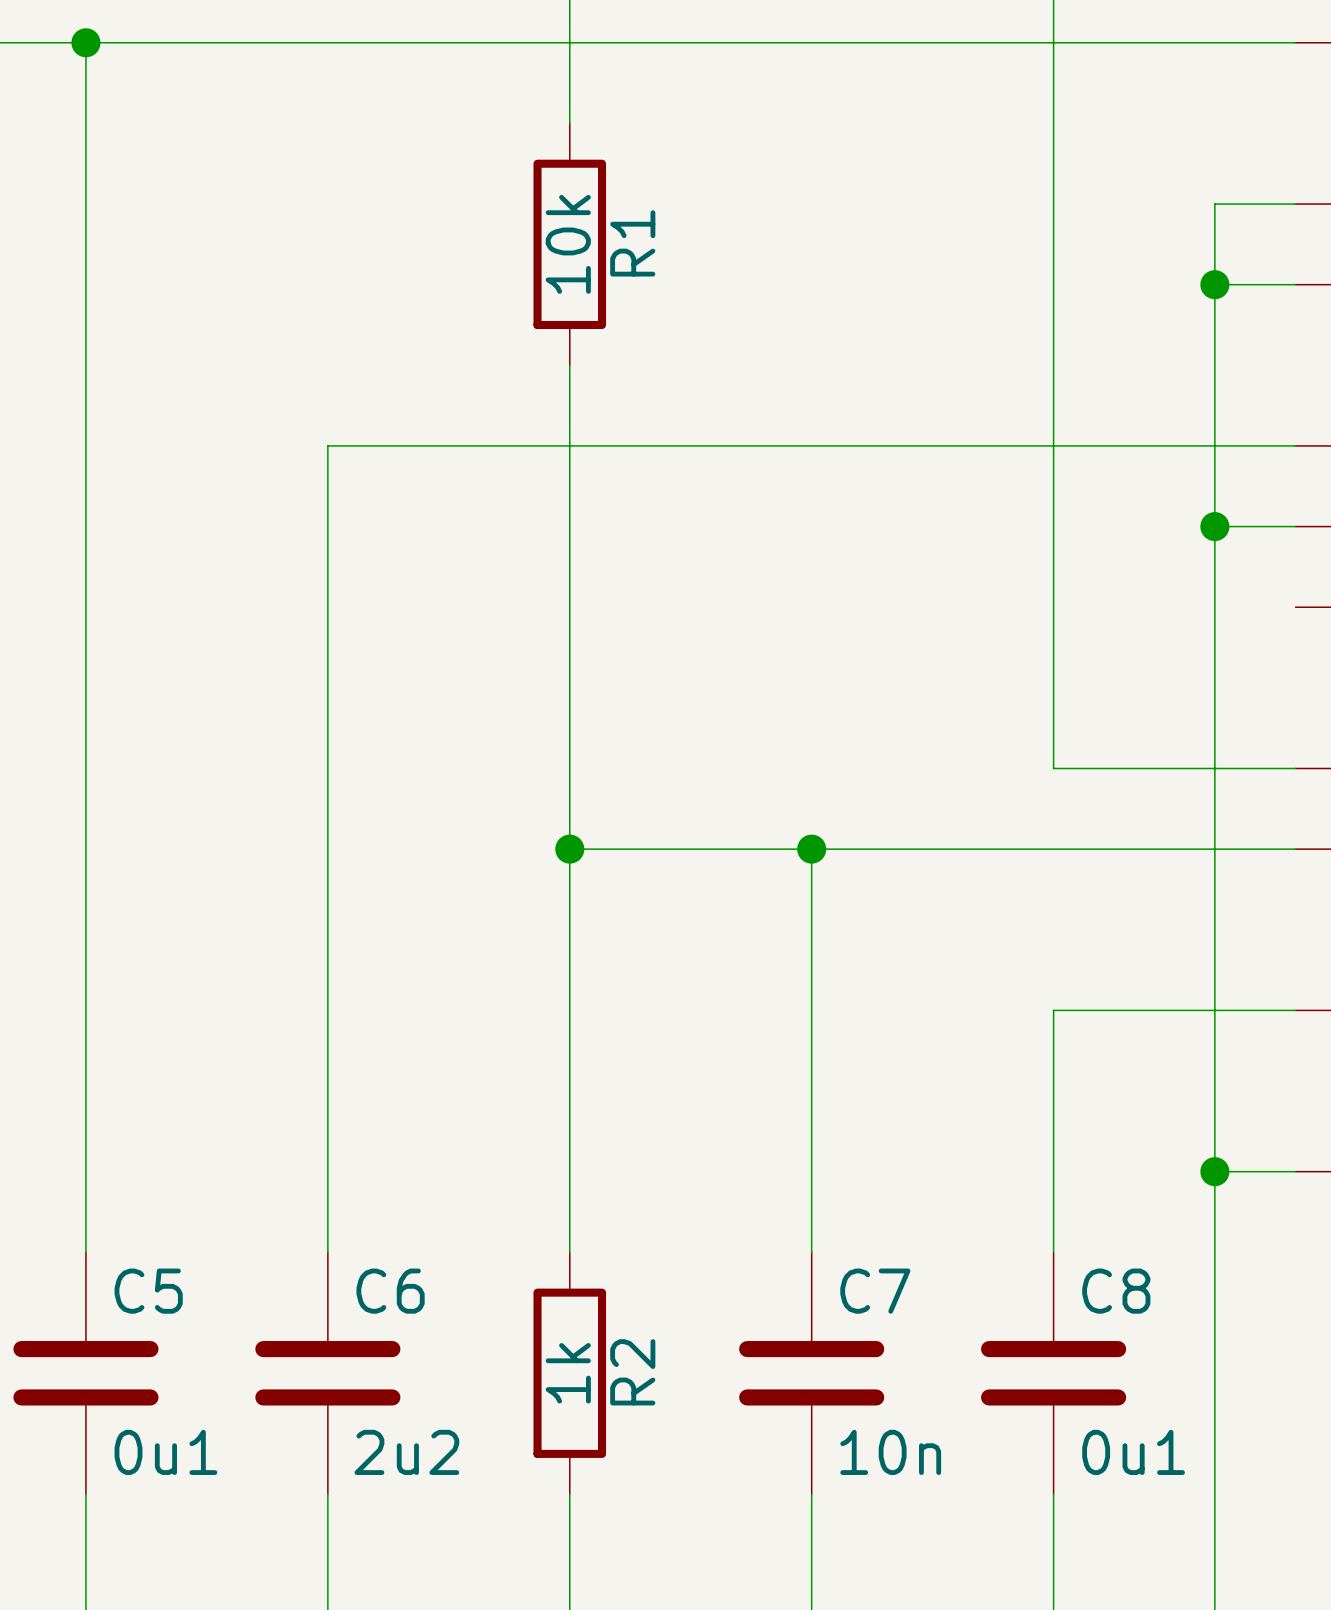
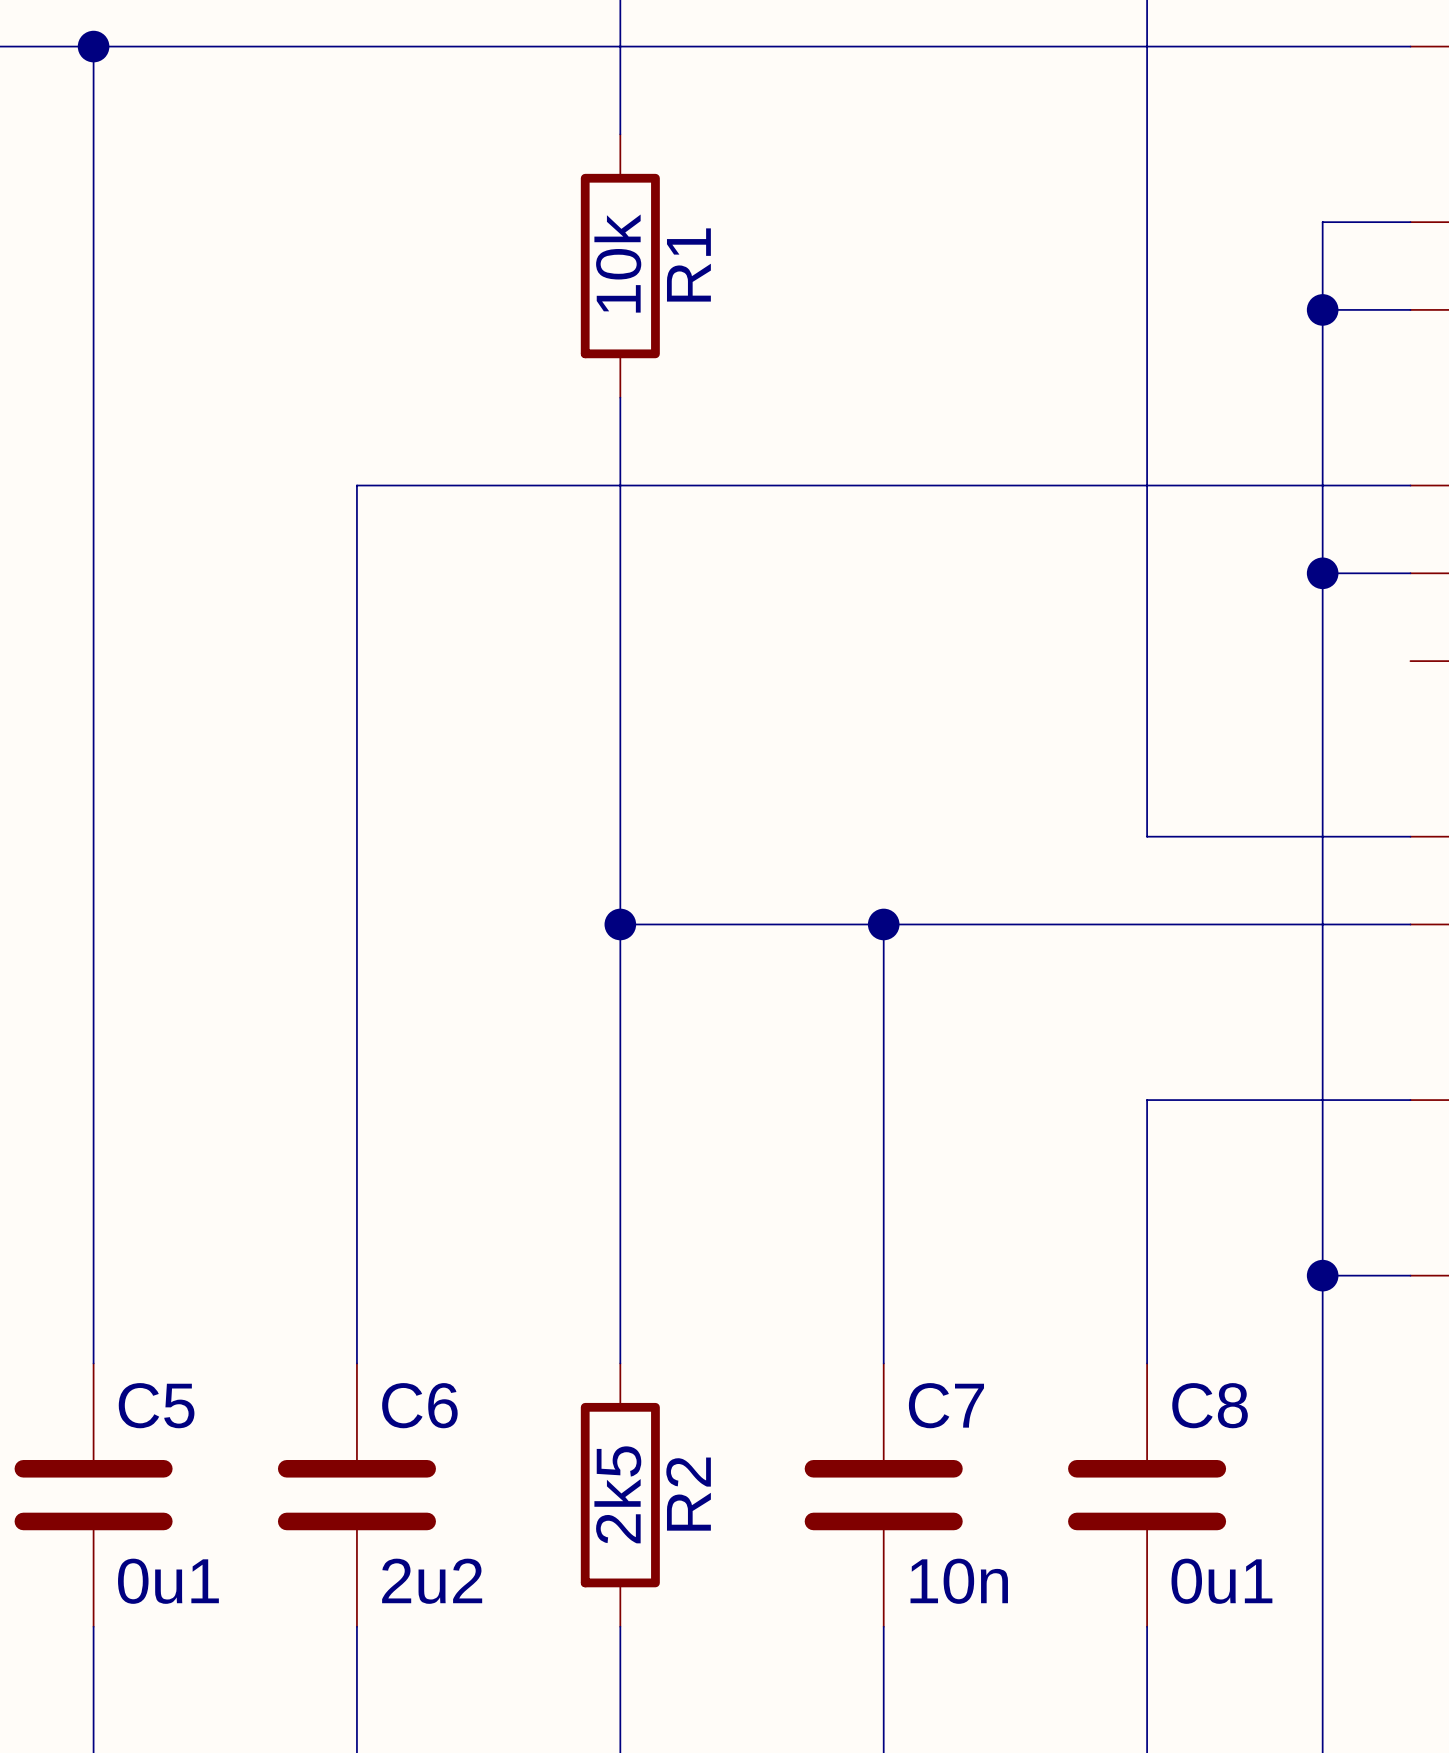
R2 value: 1k (568, 1373) -> 2k5 (617, 1494)

